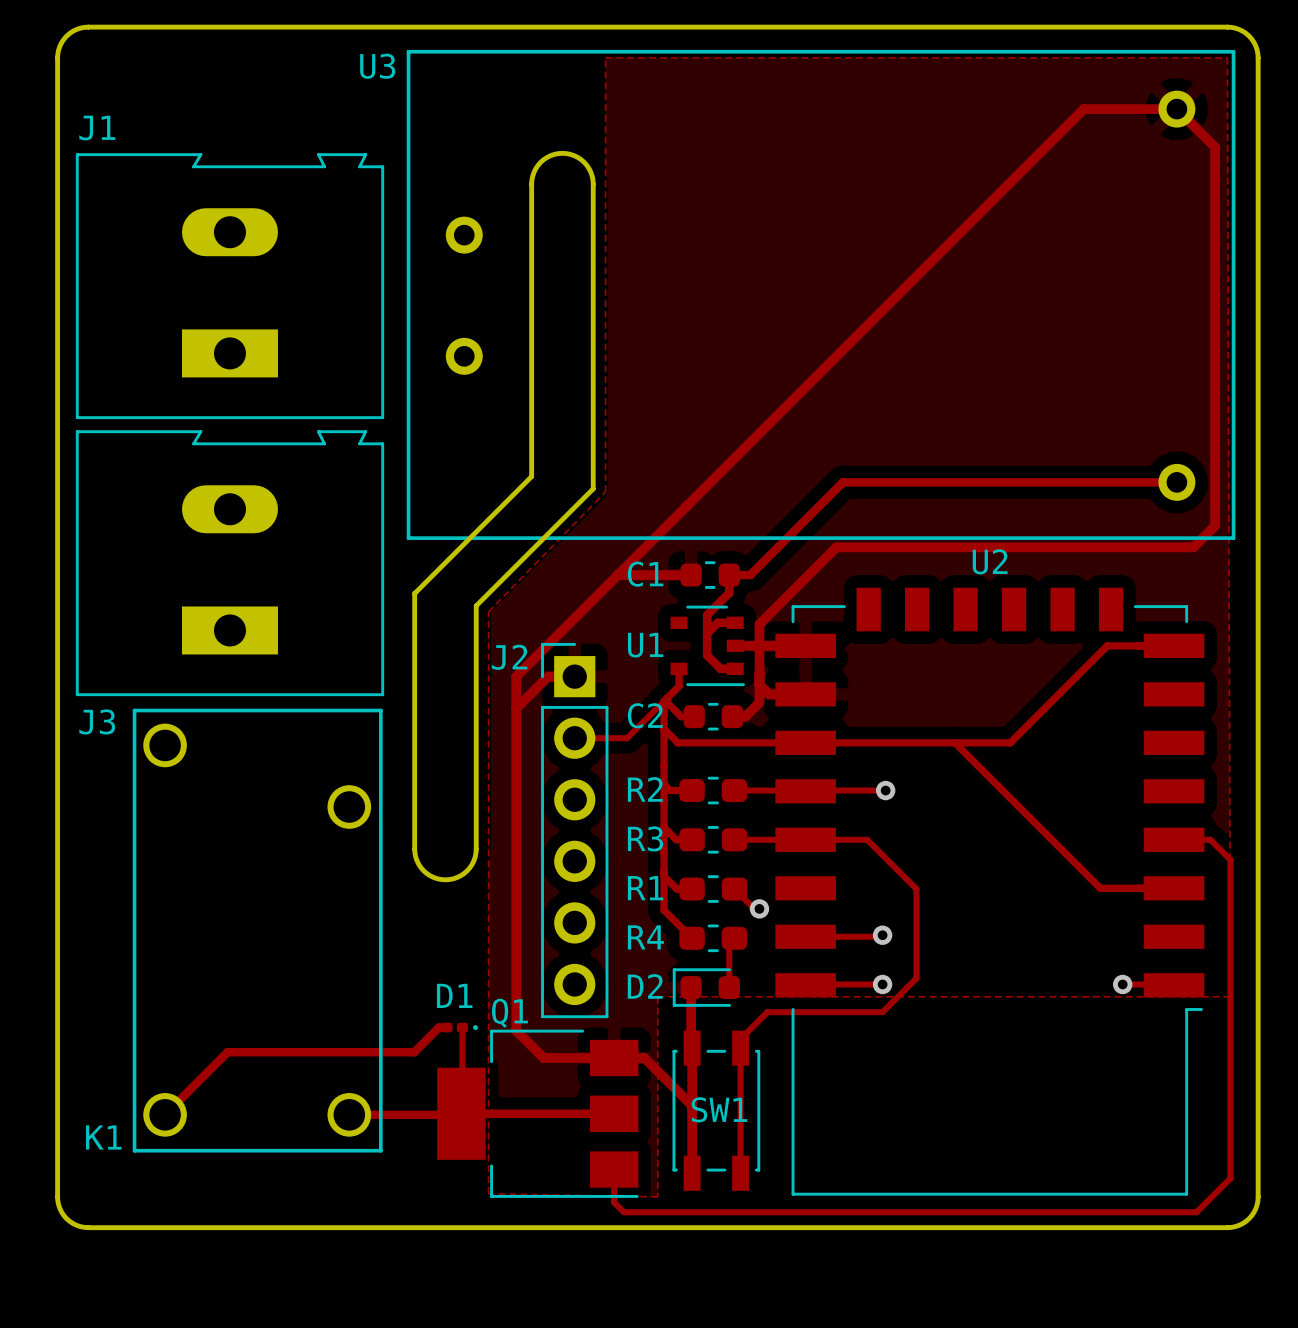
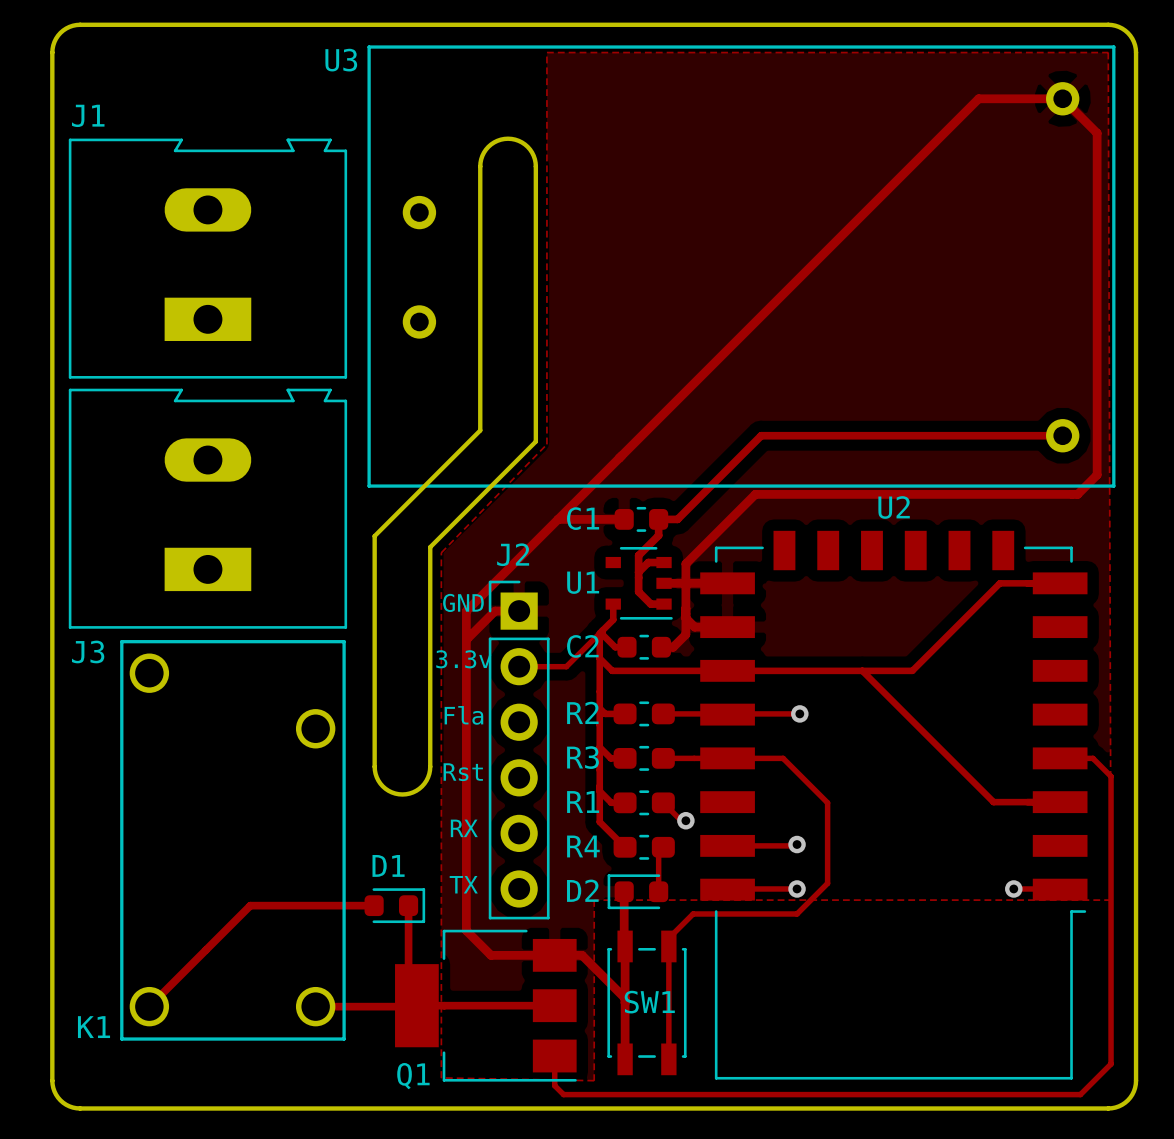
J2 name position: J2 (509, 657) -> J2 (513, 554)
text: none -> GND (463, 602)
text: none -> 3.3v (463, 659)
text: none -> Fla (463, 715)
text: none -> Rst (463, 772)
text: none -> RX (464, 828)
text: none -> TX (463, 884)
track: none -> (408, 905) (408, 997) (416, 1005)
Q1 name position: Q1 (509, 1013) -> Q1 (413, 1076)
D1 footprint: [441, 1022, 478, 1033] -> [364, 888, 426, 924]
track: (446, 1027) (438, 1027) (414, 1052) (227, 1052) -> (374, 905) (250, 905) (205, 950)
track: (462, 1027) (462, 1112) -> none

